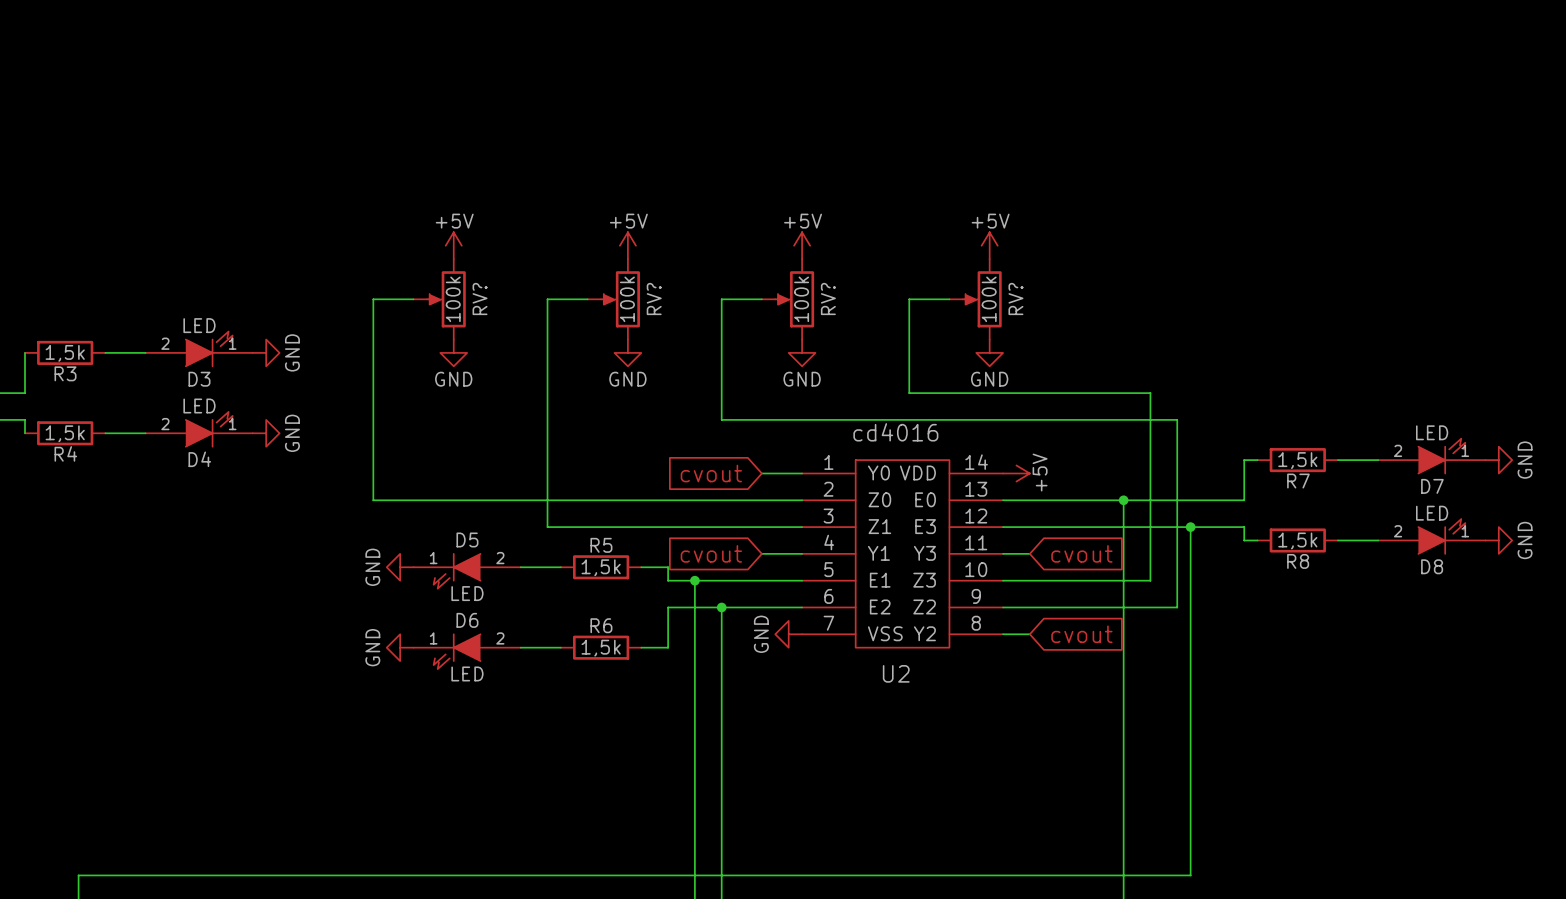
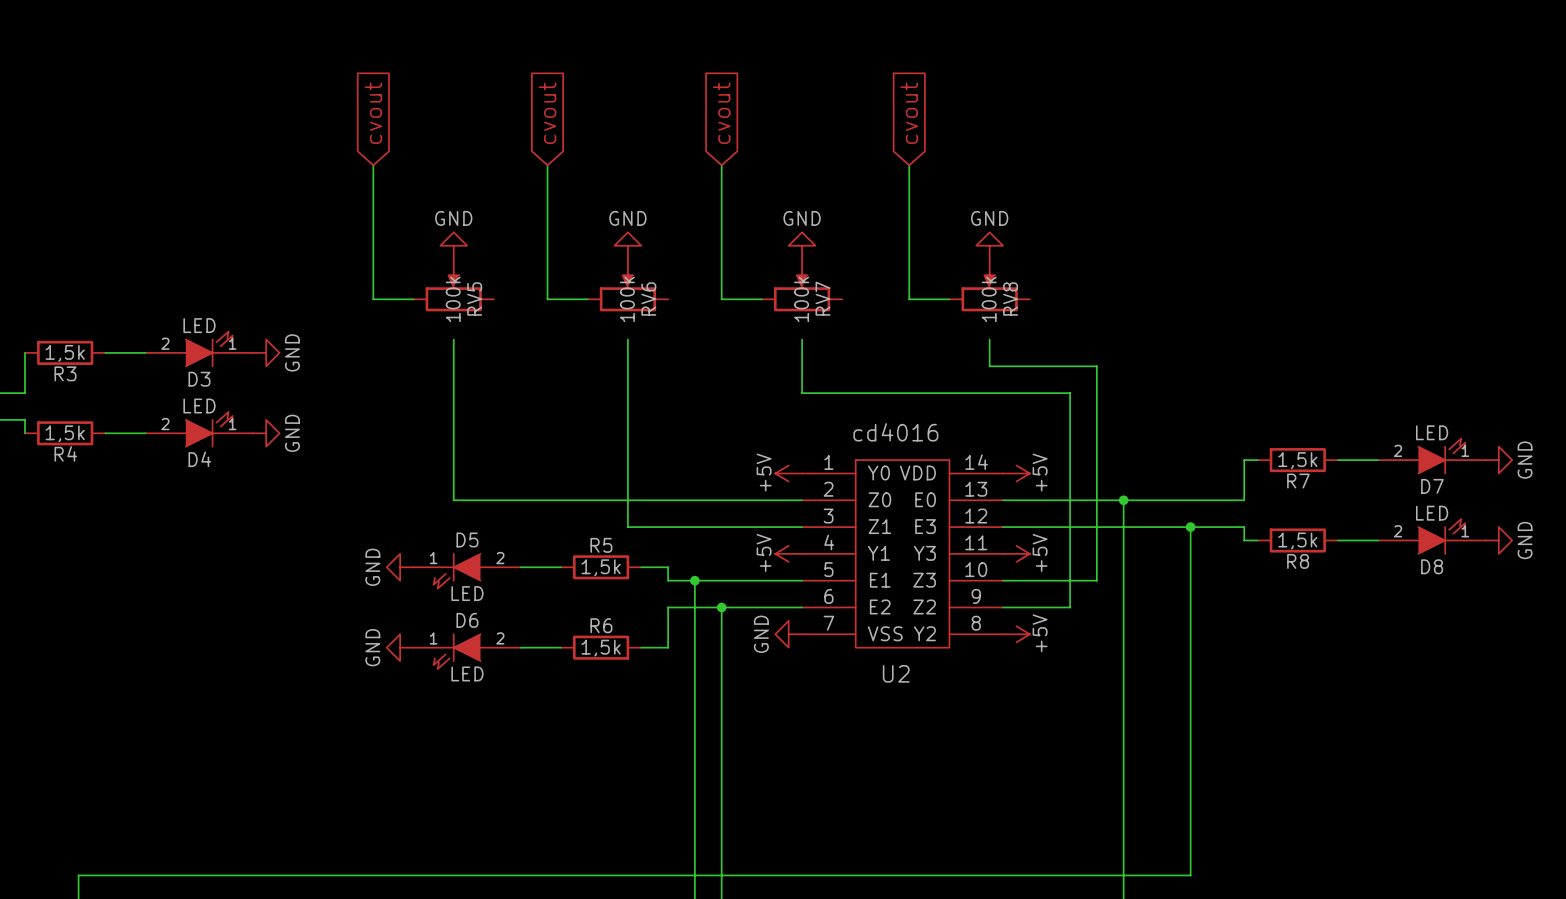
global label: none -> cvout (373, 113)
global label: none -> cvout (547, 113)
global label: none -> cvout (721, 113)
global label: none -> cvout (909, 113)
wire: none -> (373, 165) (373, 299)
wire: none -> (547, 165) (547, 299)
wire: none -> (909, 165) (909, 299)
power symbol: +5V (453, 245) -> GND (453, 245)
power symbol: +5V (627, 245) -> GND (627, 245)
power symbol: +5V (802, 245) -> GND (802, 245)
power symbol: +5V (989, 245) -> GND (989, 245)
RV5: none -> 100k (453, 285)
RV6: none -> 100k (627, 285)
RV7: none -> 100k (802, 285)
RV8: none -> 100k (989, 285)
wire: (373, 299) (373, 500) (453, 500) -> (453, 339) (453, 500)
RV?: 100k (439, 299) -> none
wire: (547, 299) (547, 527) (627, 527) -> (627, 339) (627, 527)
RV?: 100k (613, 299) -> none
wire: (721, 299) (721, 419) (1177, 419) (1177, 607) (1070, 607) -> (721, 299) (721, 165)
RV?: 100k (788, 299) -> none
wire: (909, 299) (909, 393) -> (802, 339) (802, 393) (909, 393)
RV?: 100k (975, 299) -> none
wire: none -> (989, 339) (989, 366) (1096, 366) (1096, 580)
power symbol: GND (453, 352) -> none
power symbol: GND (627, 352) -> none
power symbol: GND (802, 352) -> none
power symbol: GND (989, 352) -> none
wire: (1070, 393) (1150, 393) (1150, 580) (1096, 580) -> (1070, 393) (1070, 607)
global label: cvout (711, 473) -> none
power symbol: none -> +5V (788, 473)
global label: cvout (711, 553) -> none
power symbol: none -> +5V (788, 553)
power symbol: none -> +5V (1016, 553)
global label: cvout (1081, 553) -> none
power symbol: none -> +5V (1016, 634)
global label: cvout (1081, 634) -> none

